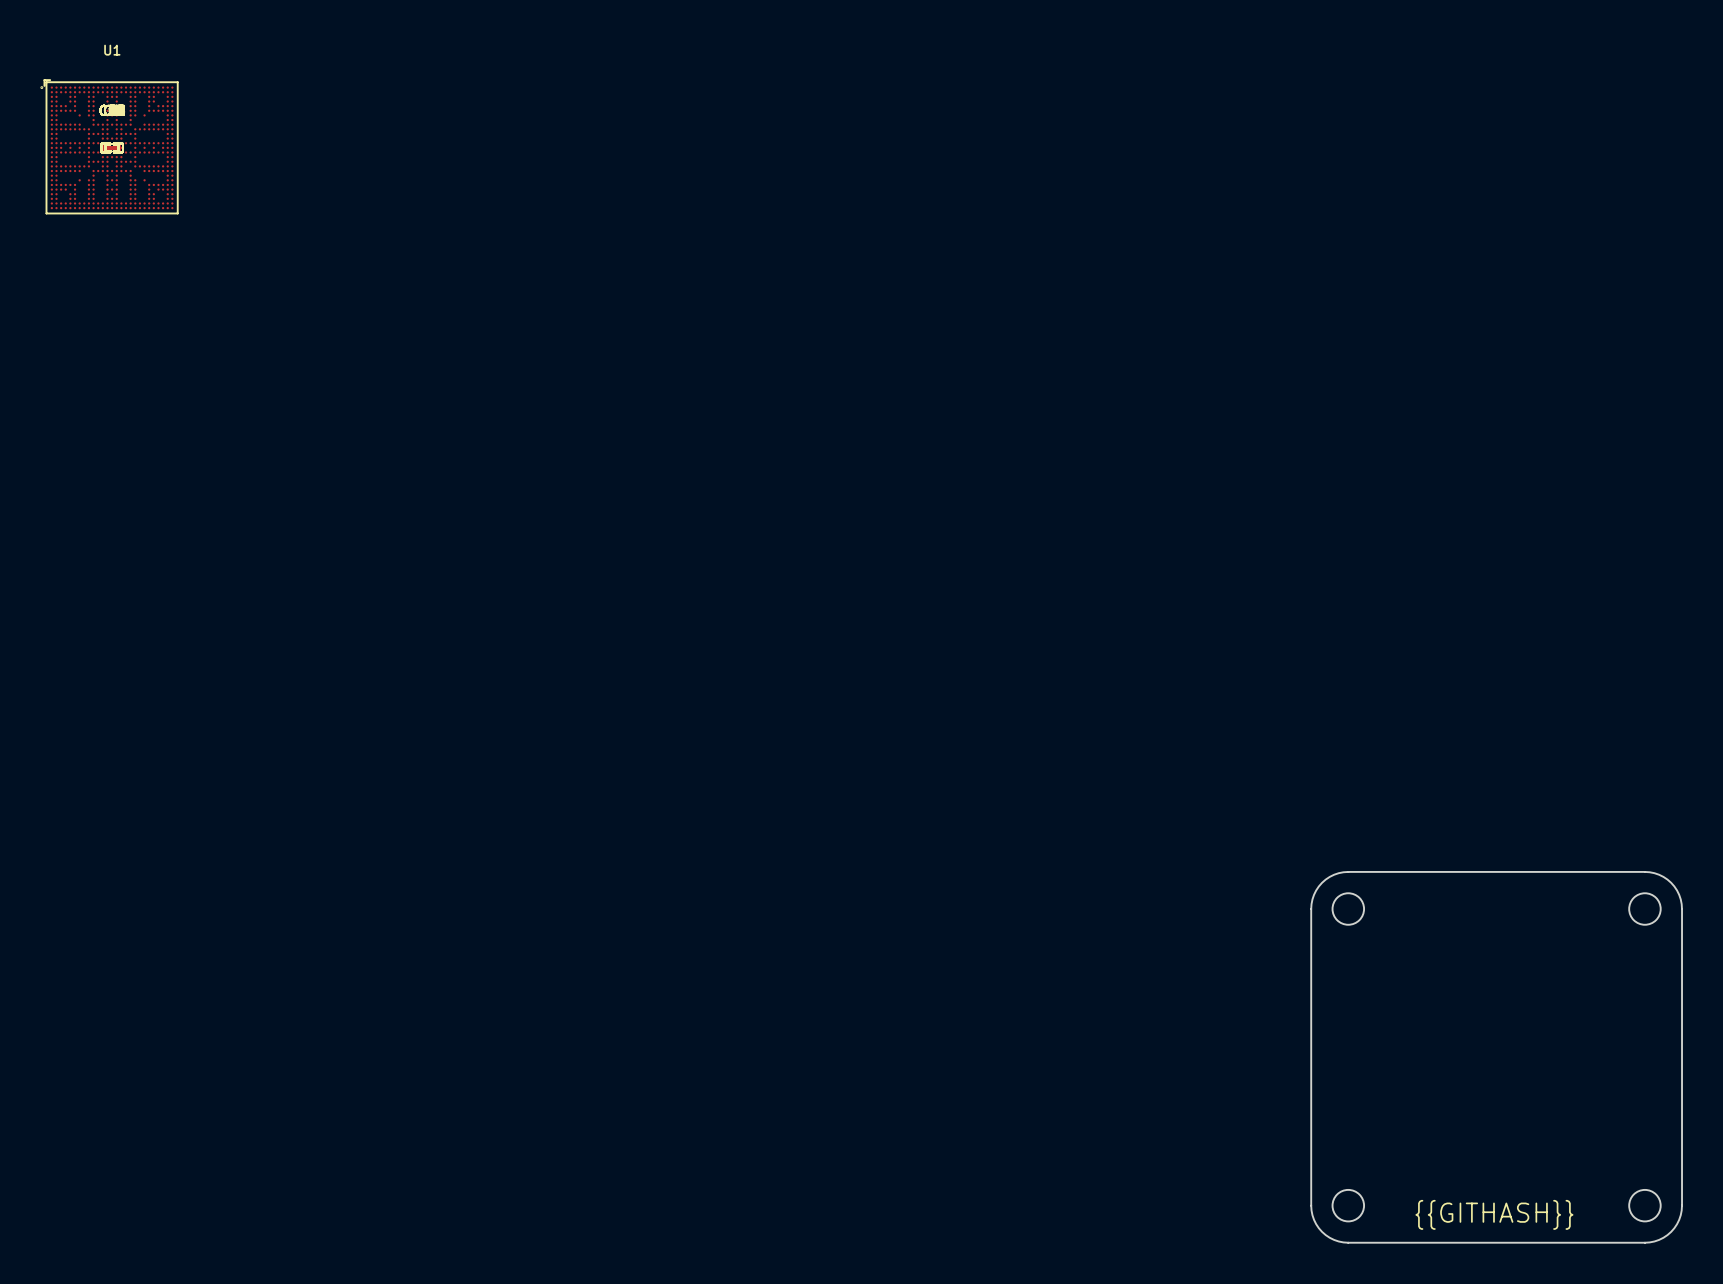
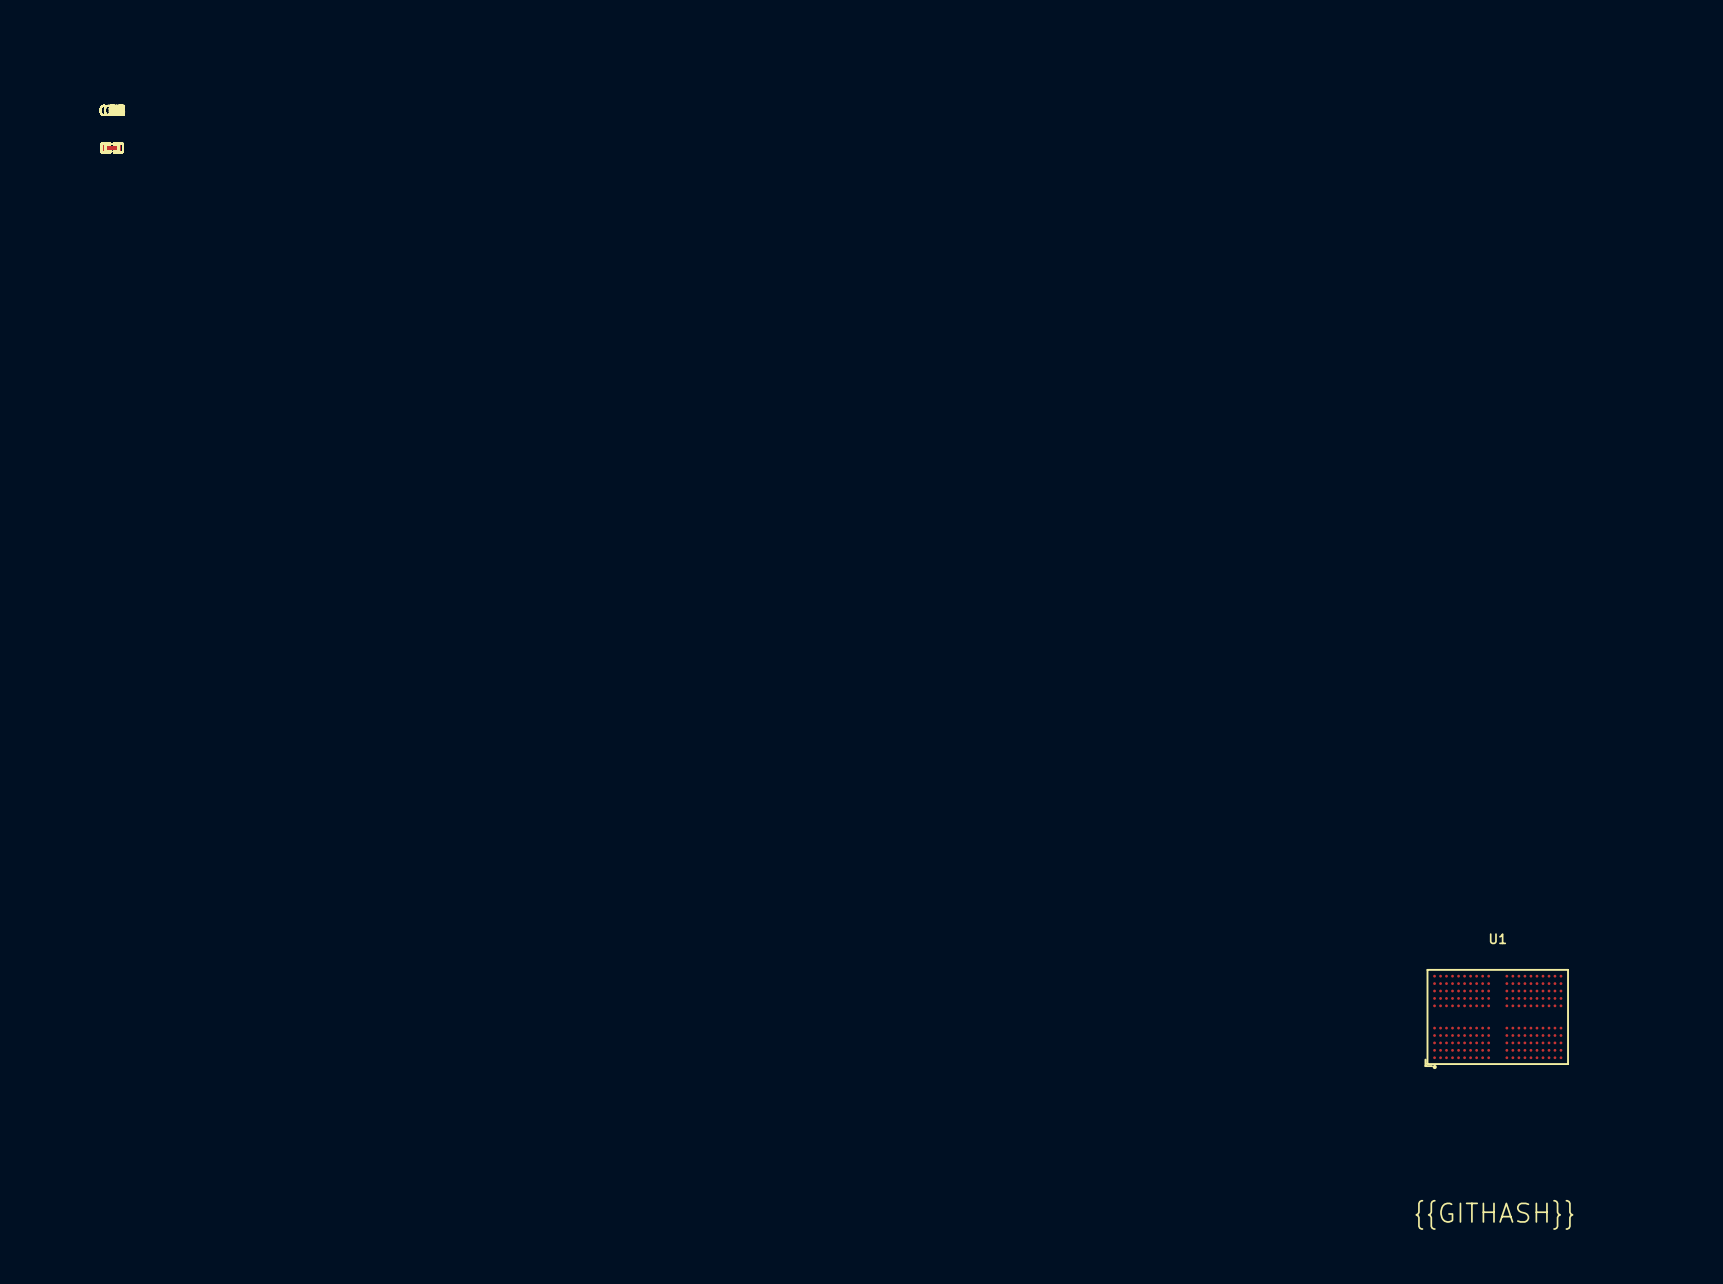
U1 footprint: [40, 79, 179, 215] -> [1424, 969, 1569, 1069]
board edge: (1348, 871) (1644, 871) (1659, 874) (1671, 882) (1679, 894) (1682, 909) (1682, 1205) (1679, 1219) (1671, 1231) (1659, 1239) (1644, 1242) (1348, 1242) (1334, 1239) (1322, 1231) (1314, 1219) (1311, 1205) (1311, 904) (1316, 890) (1325, 879) (1338, 873) (1348, 871) -> none
round board edge: [1332, 892, 1365, 926] -> none
round board edge: [1628, 892, 1662, 926] -> none
round board edge: [1332, 1189, 1365, 1222] -> none
round board edge: [1628, 1189, 1662, 1222] -> none

